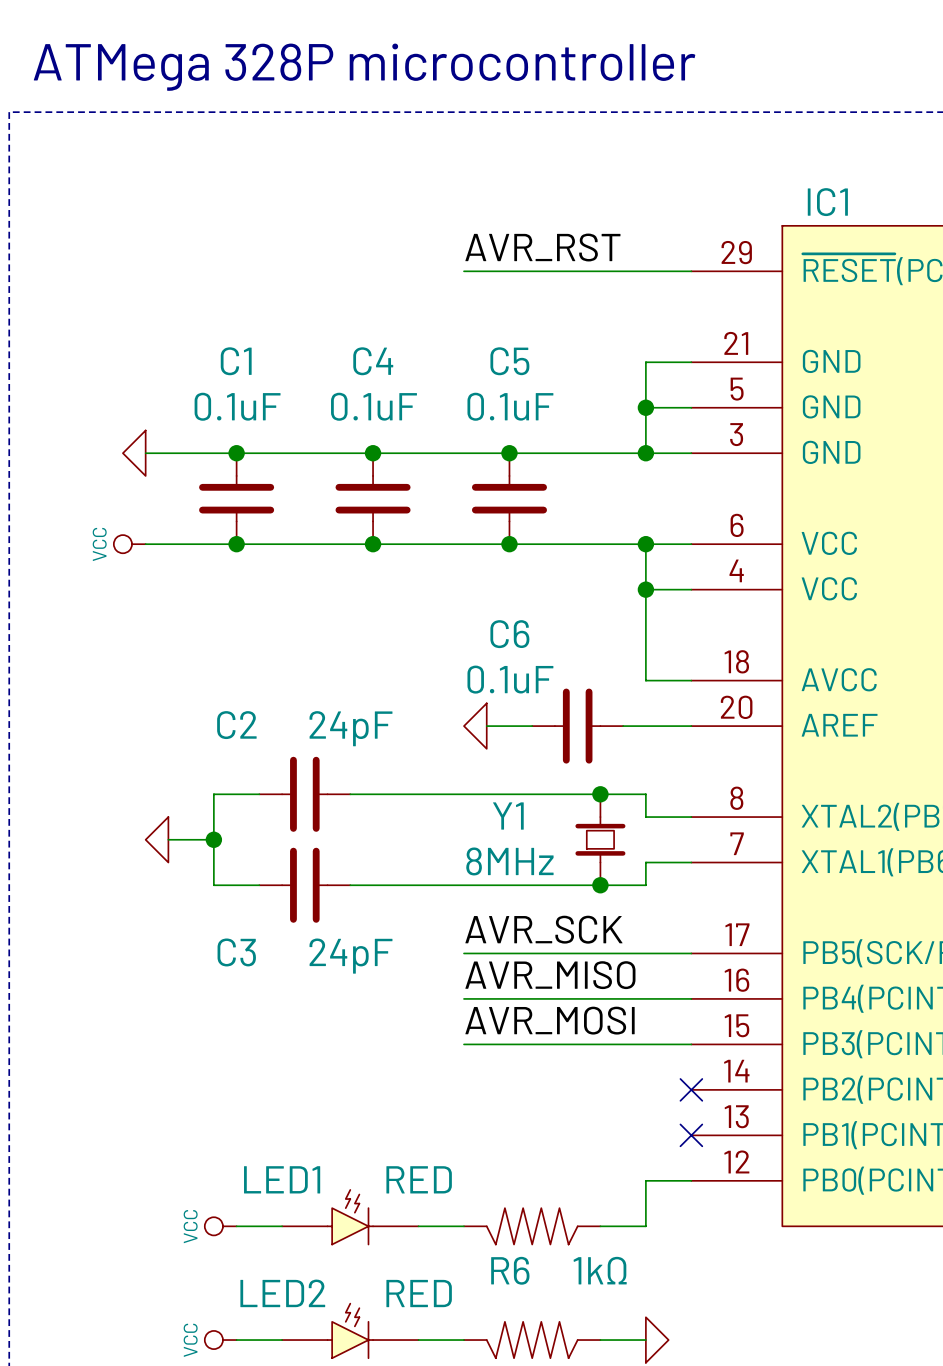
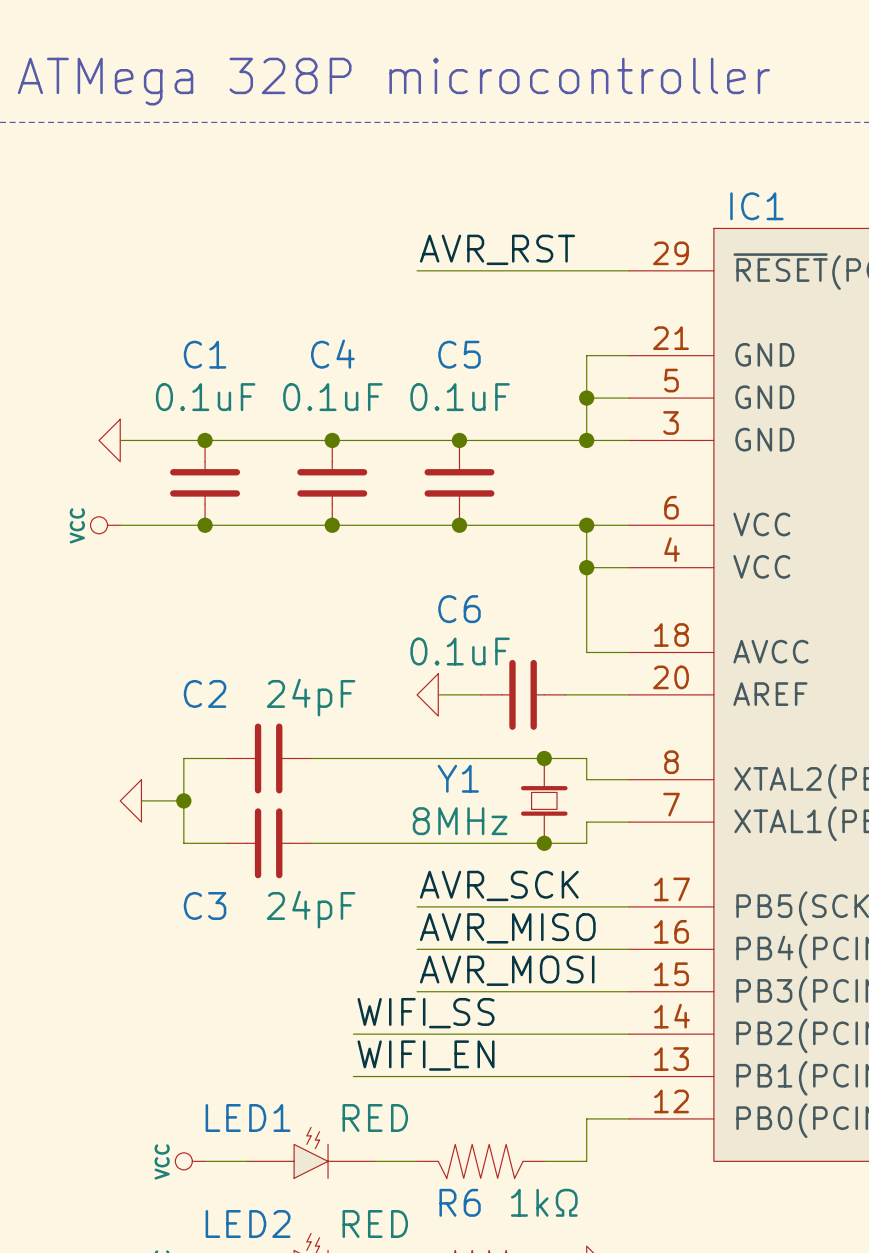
label: none -> WIFI_SS (426, 1013)
wire: none -> (353, 1034) (629, 1034)
no-connect mark: (691, 1089) -> none
label: none -> WIFI_EN (426, 1055)
wire: none -> (353, 1076) (629, 1076)
no-connect mark: (691, 1135) -> none

